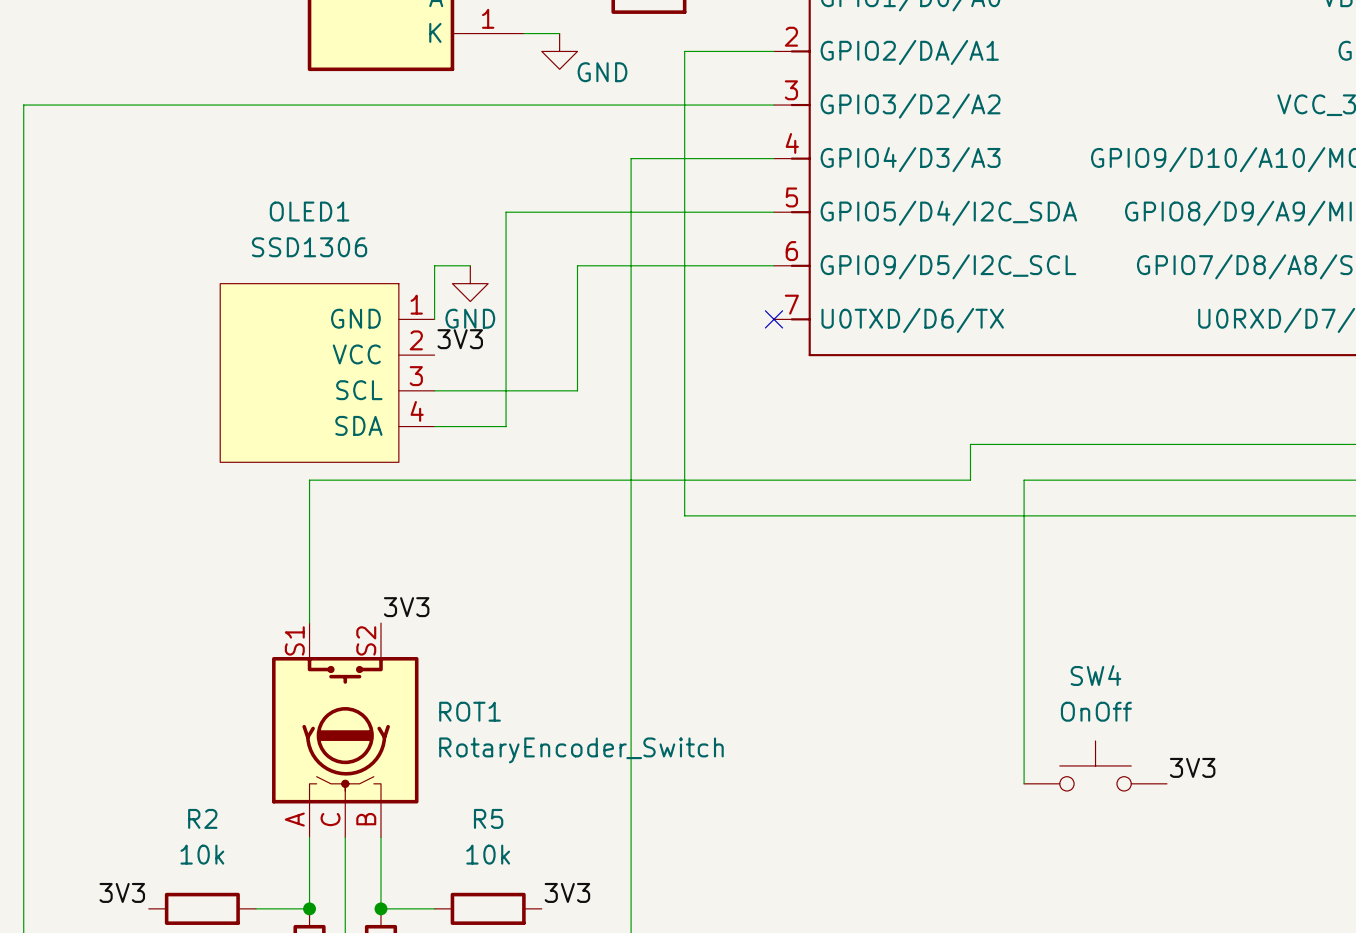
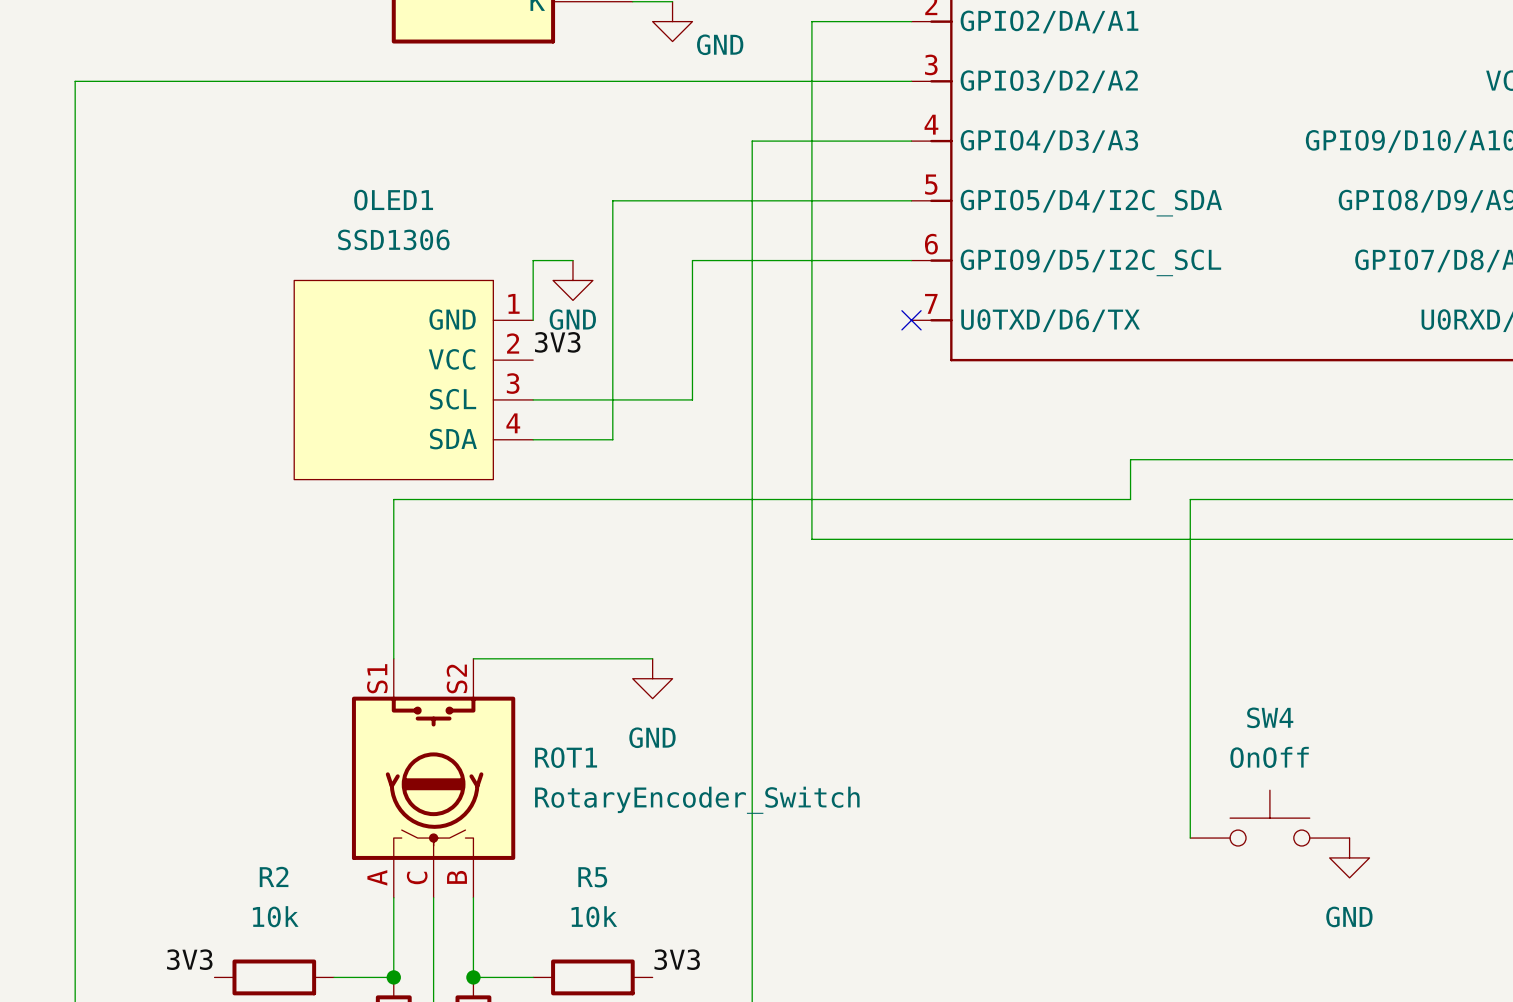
label: 3V3 (406, 607) -> none
wire: none -> (473, 658) (652, 658)
power symbol: none -> GND (652, 678)
label: 3V3 (1192, 767) -> none
power symbol: none -> GND (1349, 857)

